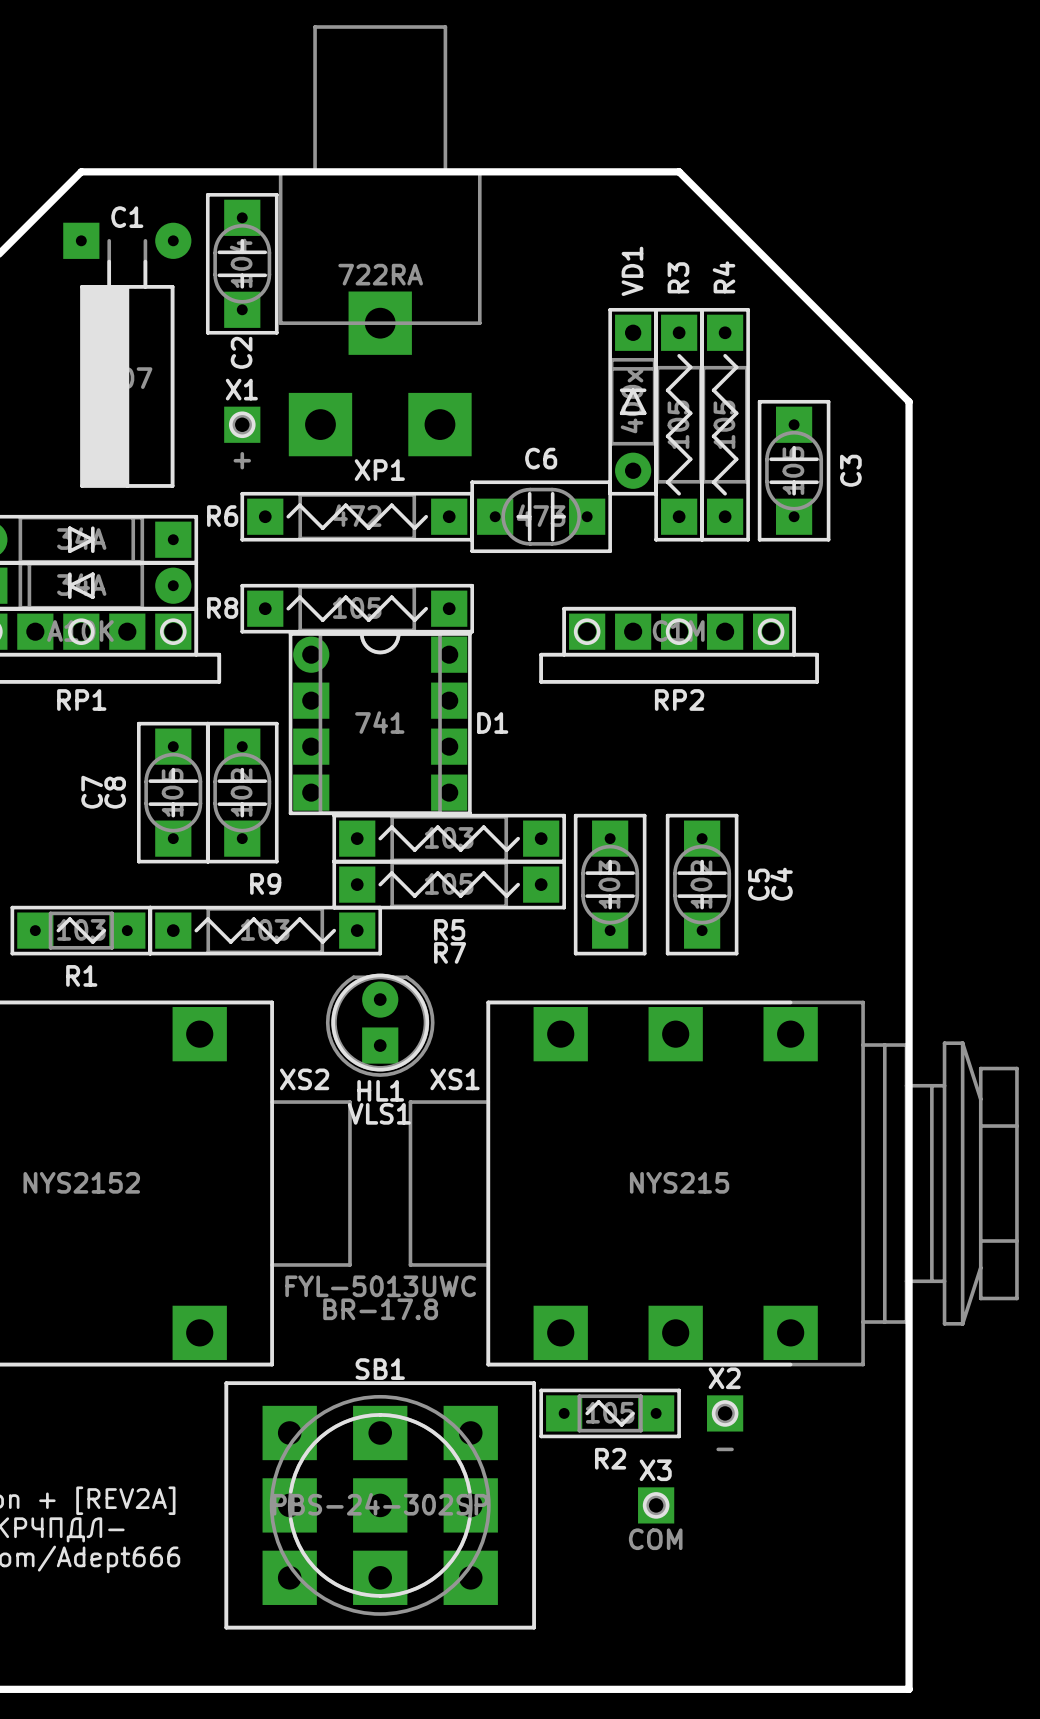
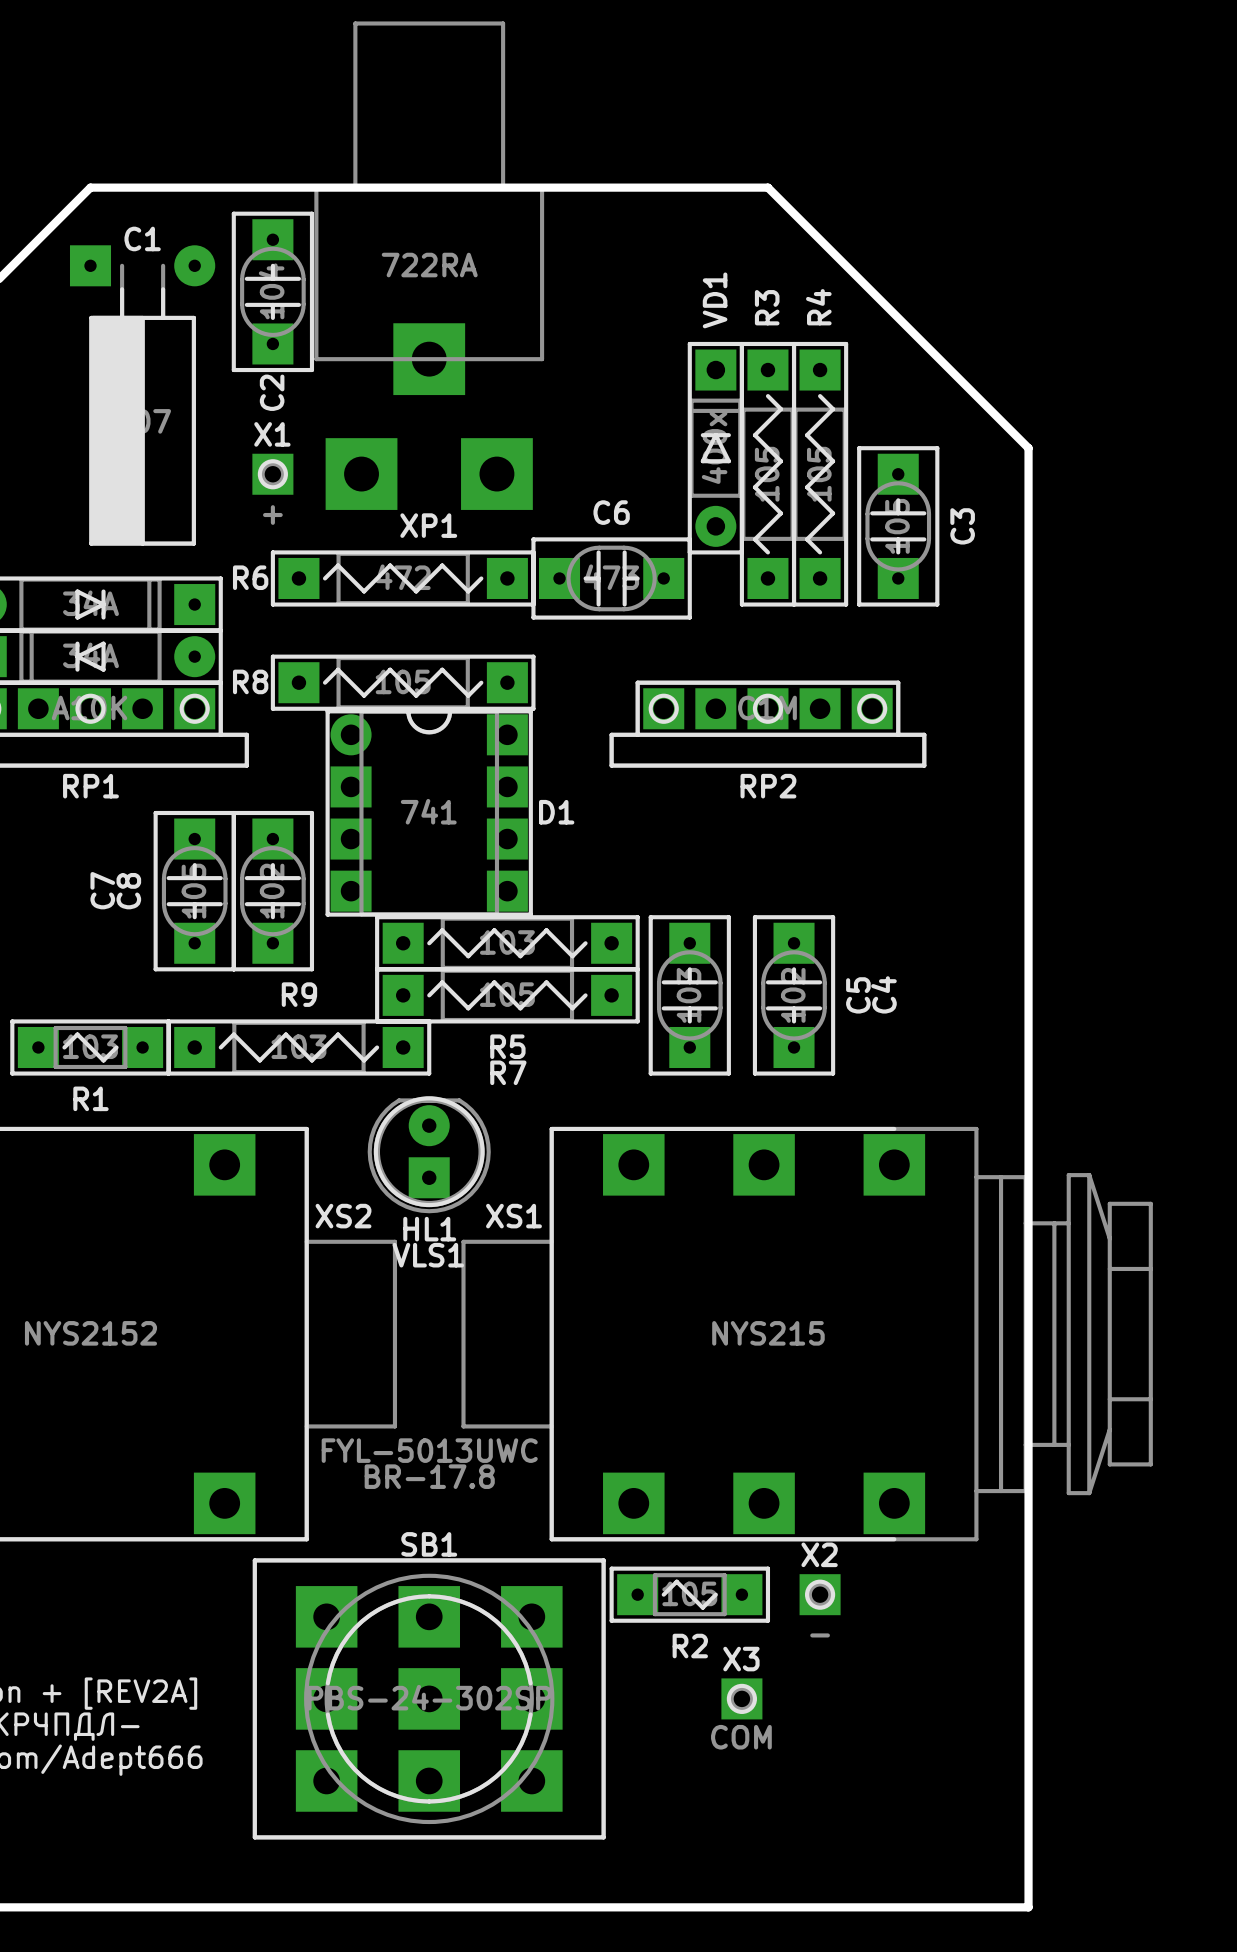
XP1 value position: 722RA (380, 274) -> 722RA (429, 265)

